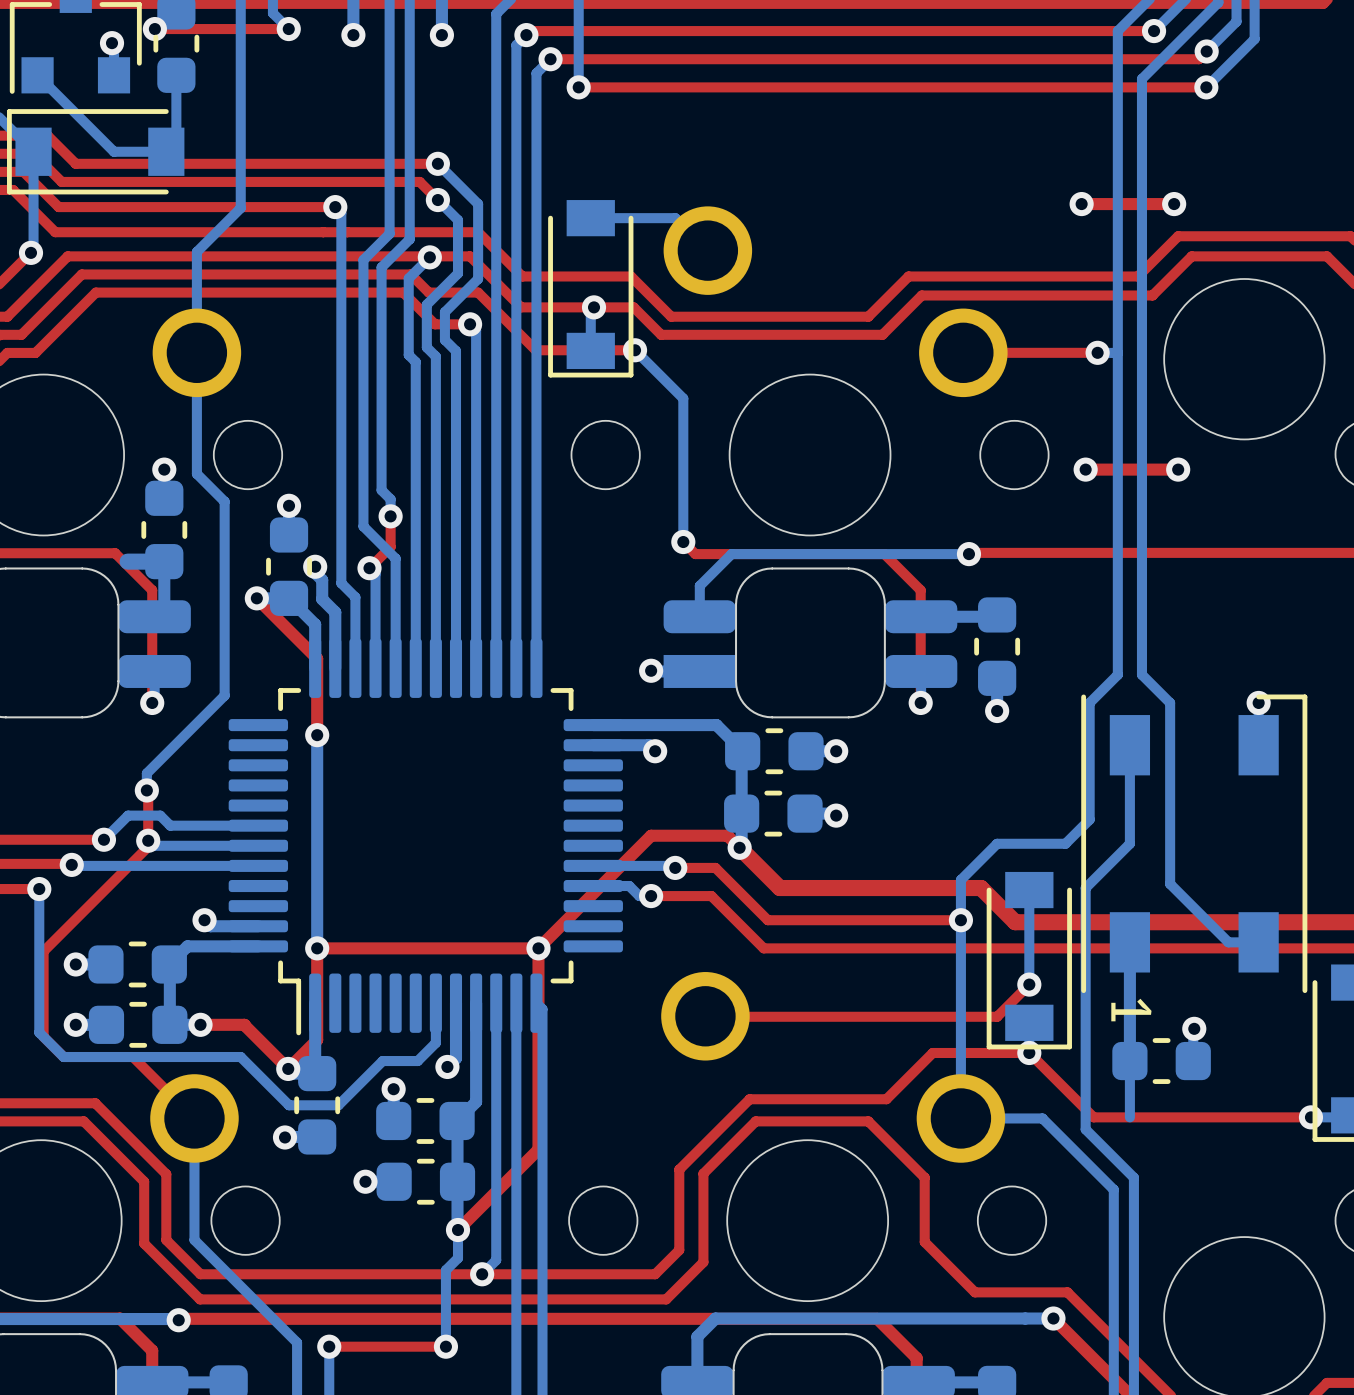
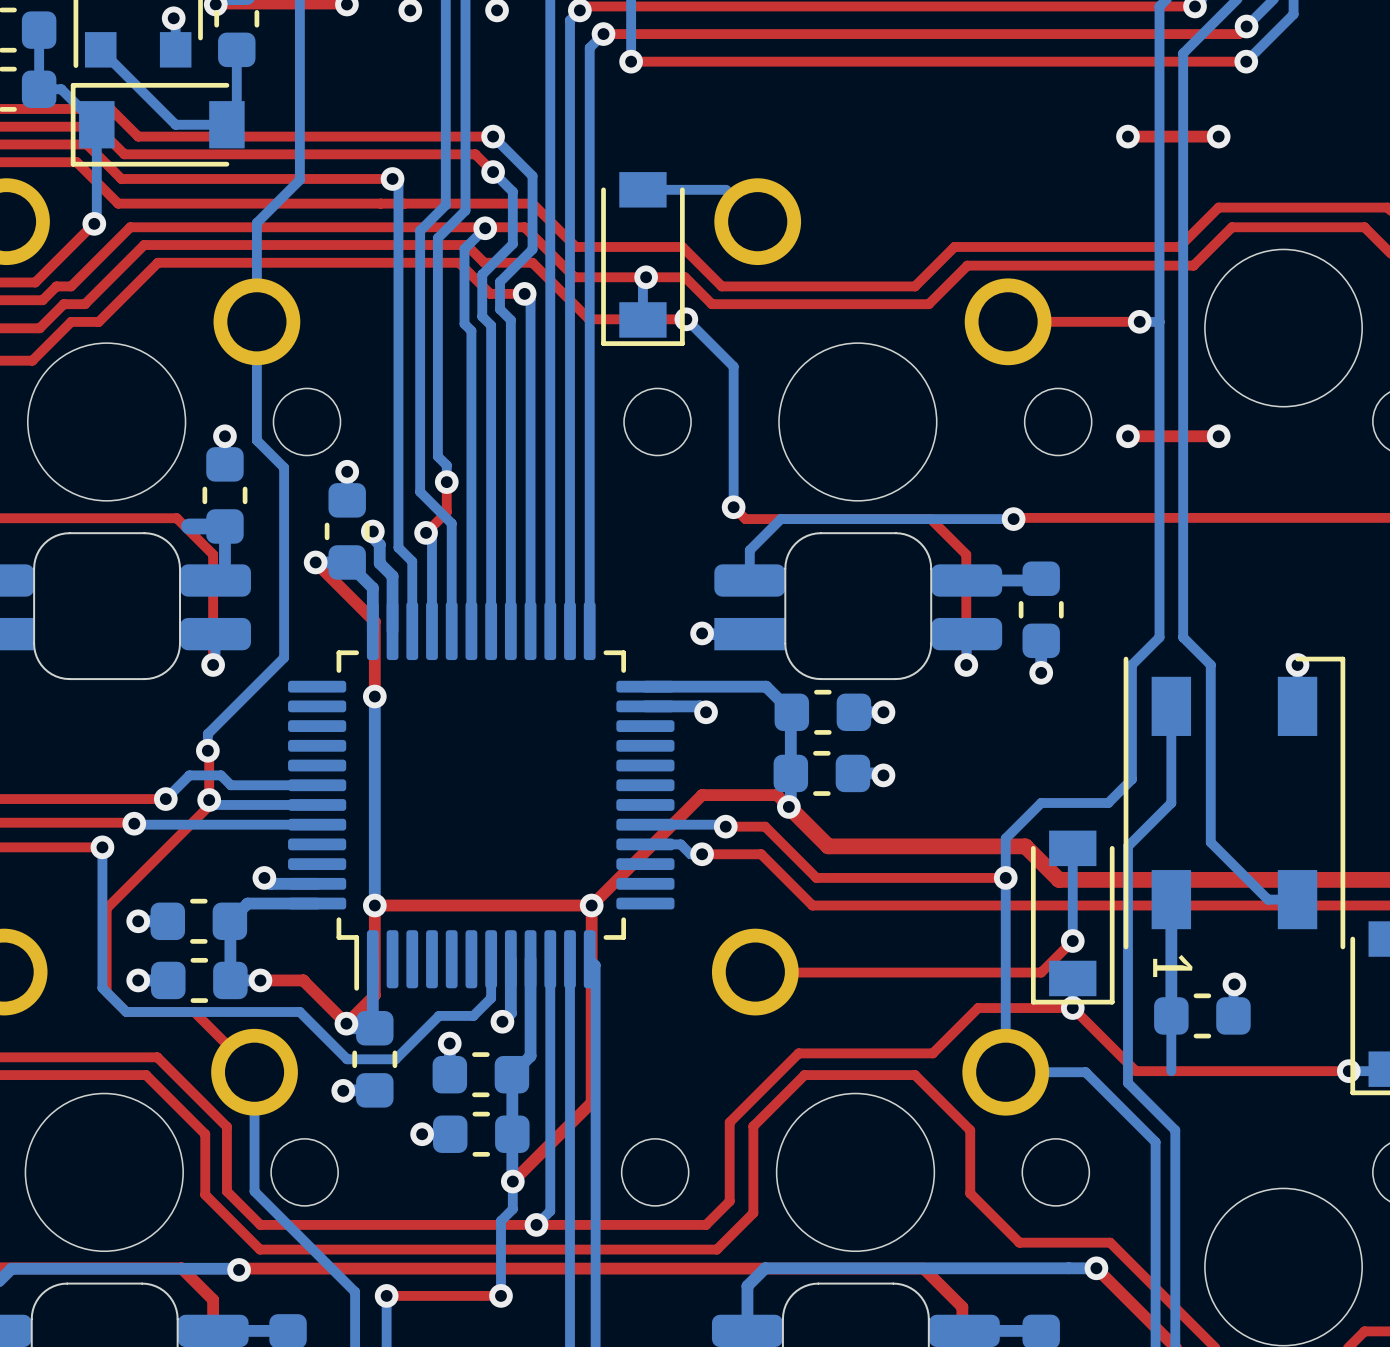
via position: (1081, 204) -> (1127, 136)
top track: (1174, 204) (1081, 204) -> (1218, 136) (1127, 136)
via position: (1174, 204) -> (1218, 136)

